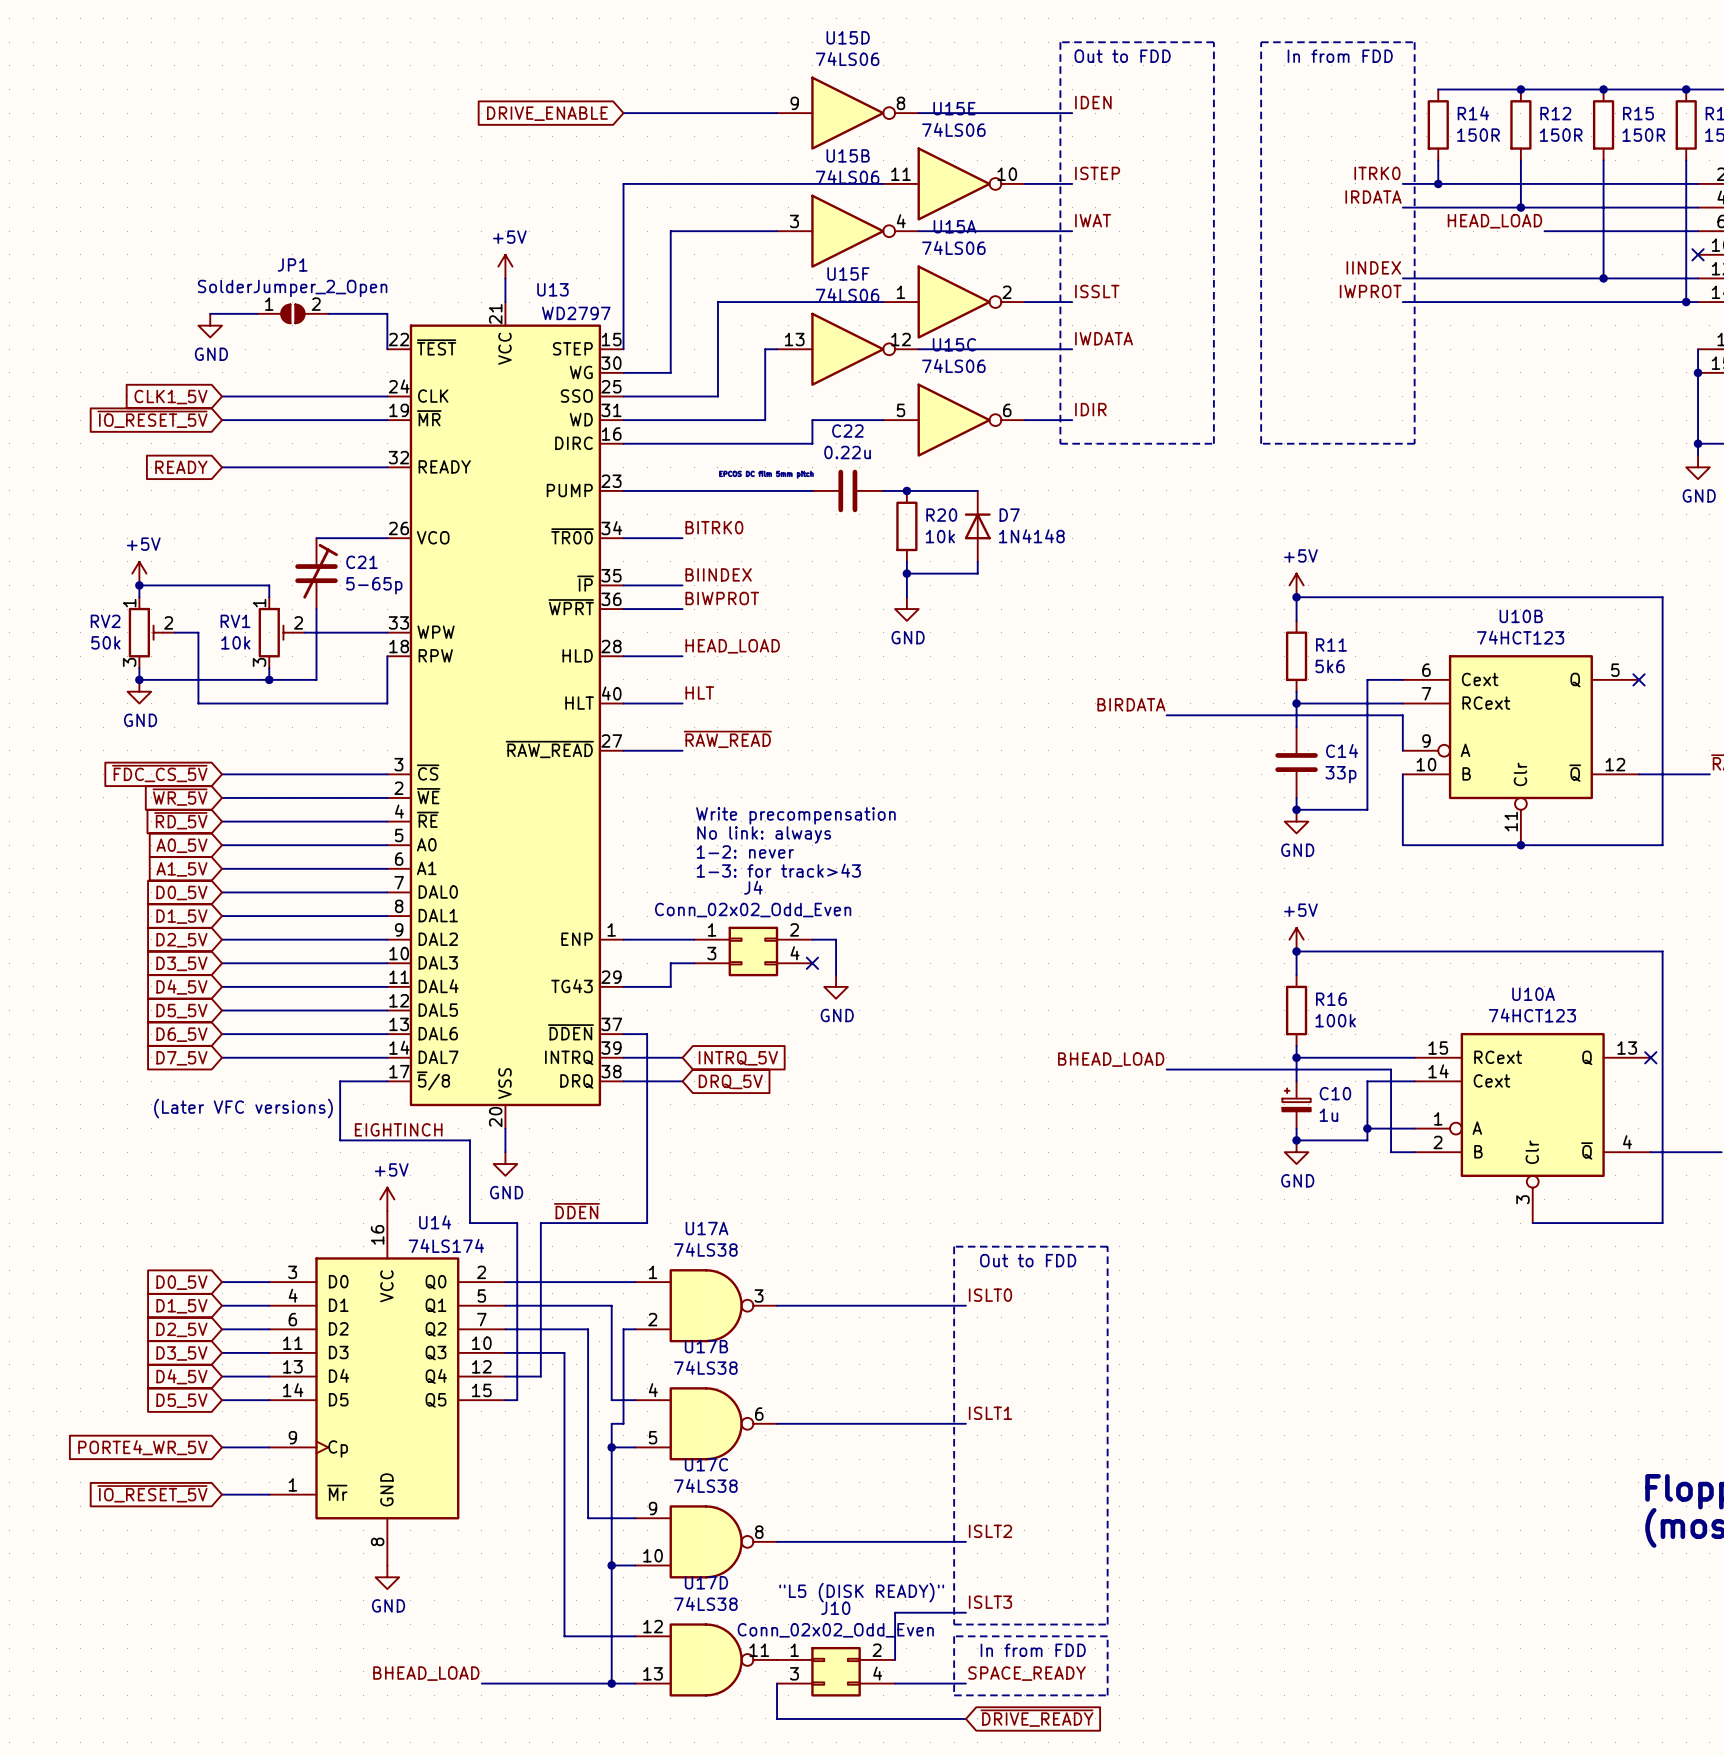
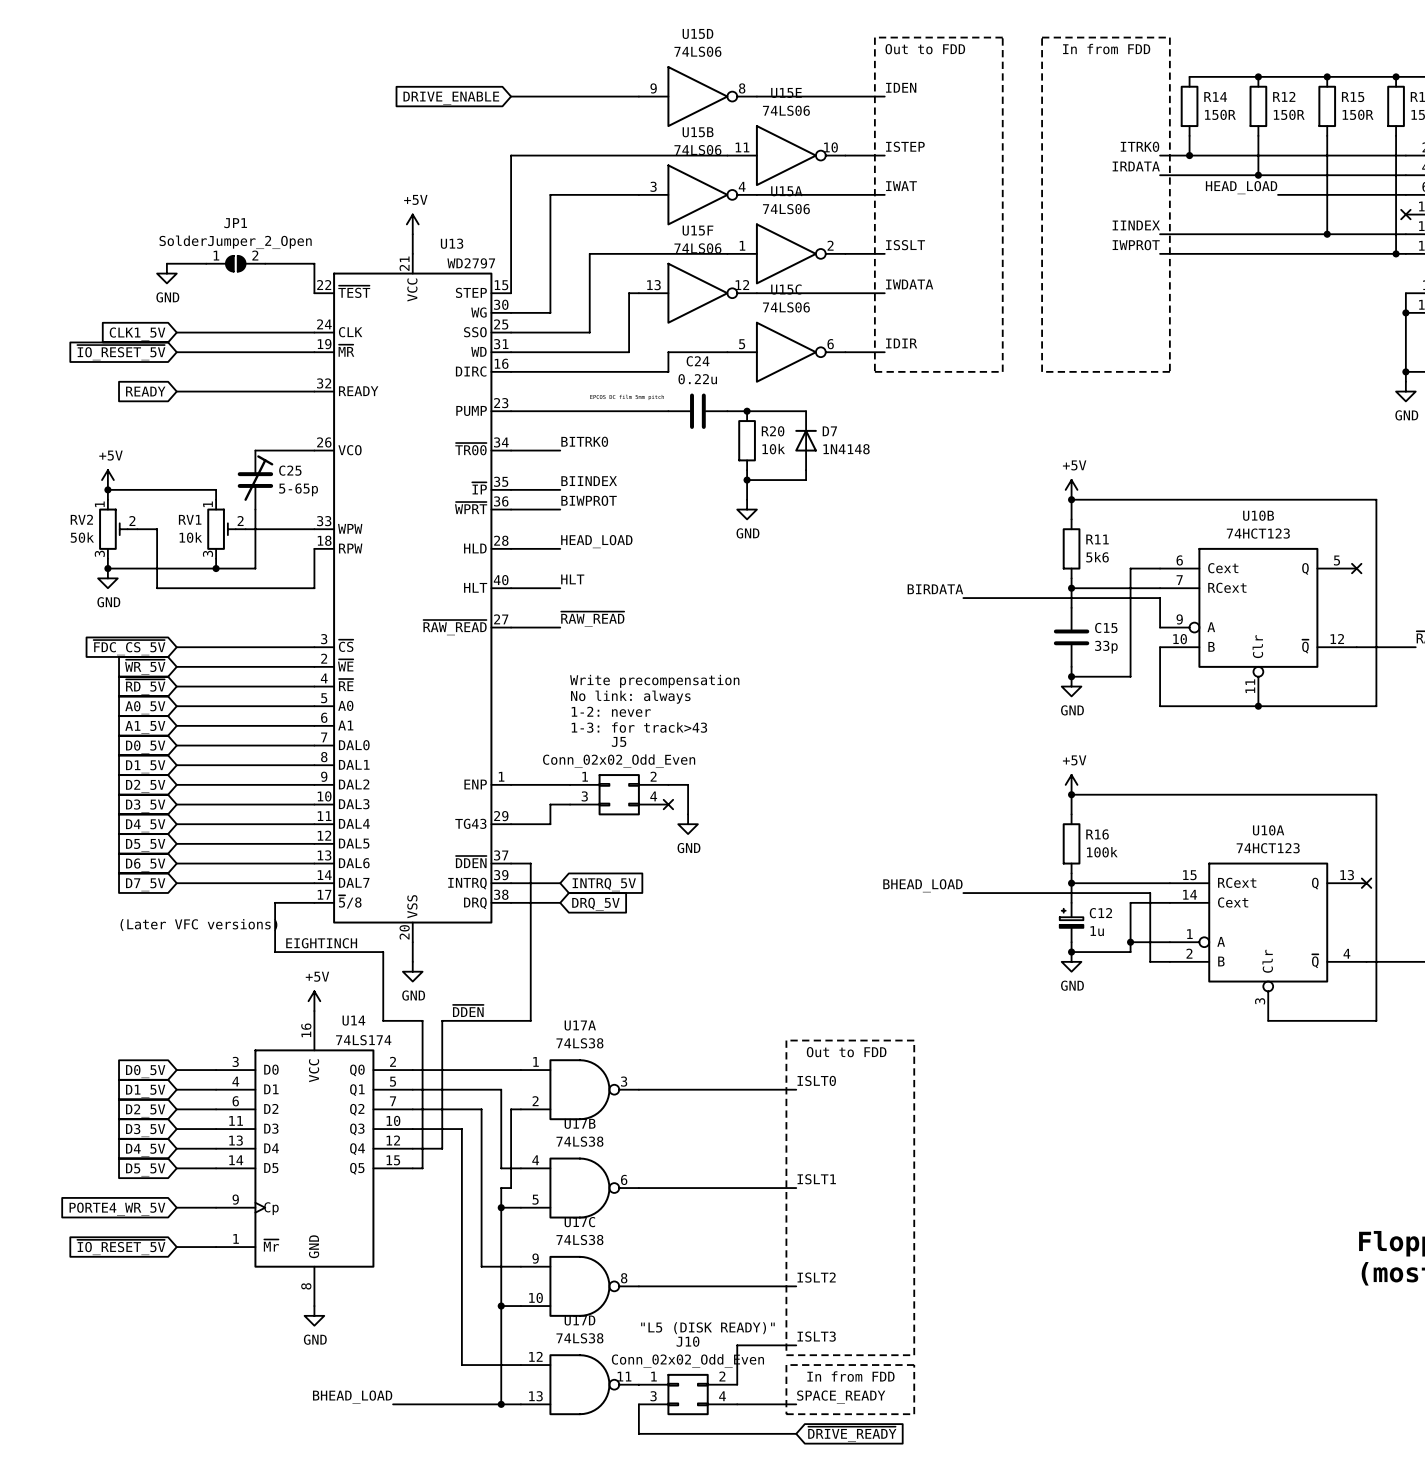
C22 name: C22 (847, 431) -> C24 (698, 361)
C21 name: C21 (361, 562) -> C25 (290, 470)
C14 name: C14 (1342, 750) -> C15 (1106, 627)
J4 name: J4 (753, 887) -> J5 (619, 741)
C10 name: C10 (1335, 1093) -> C12 (1100, 913)

